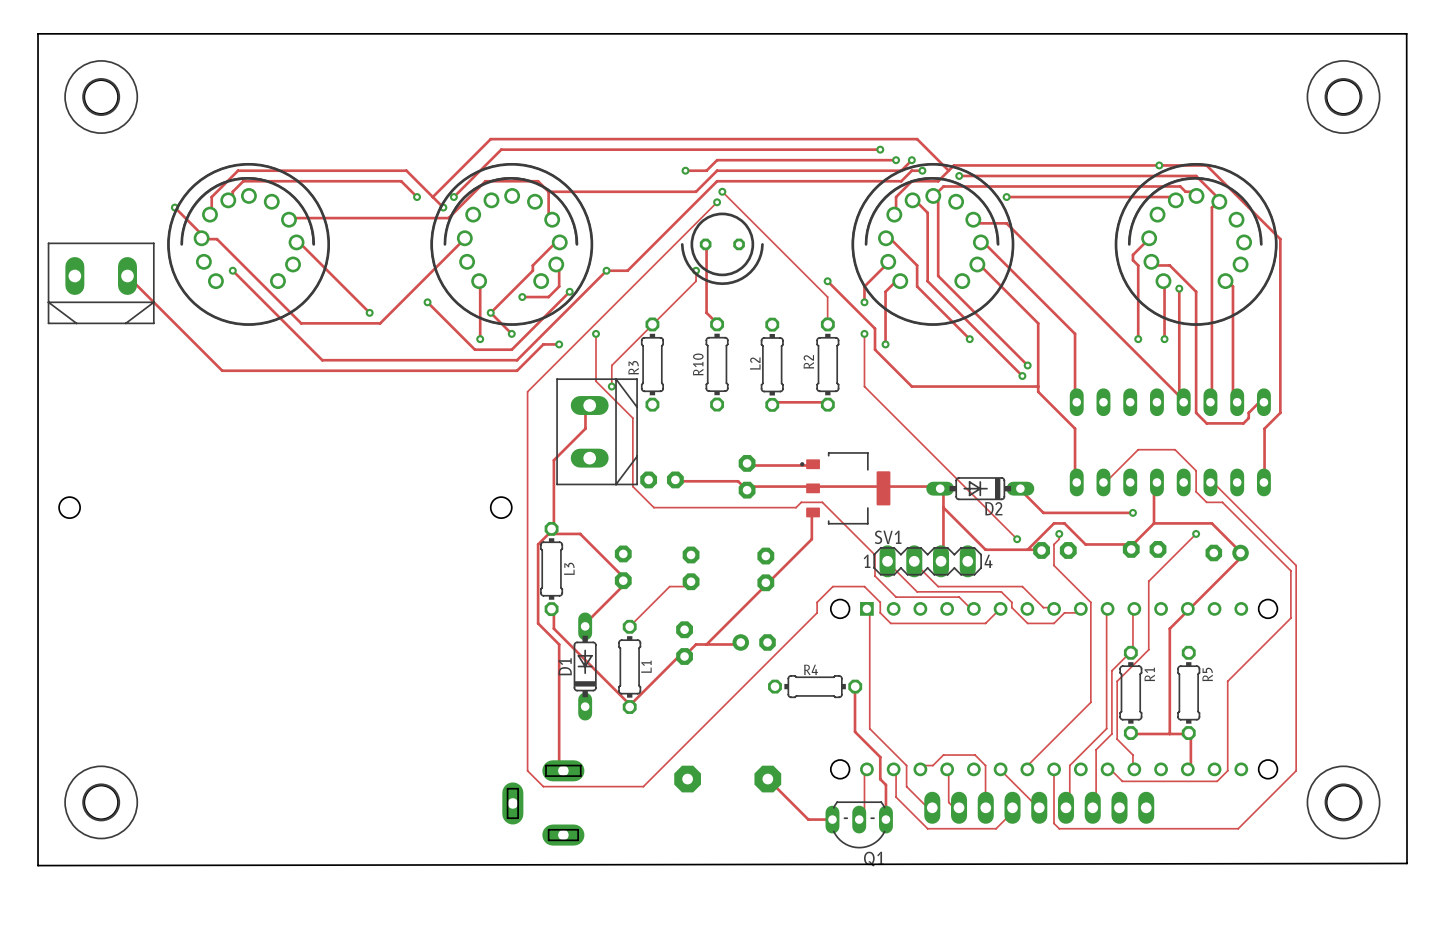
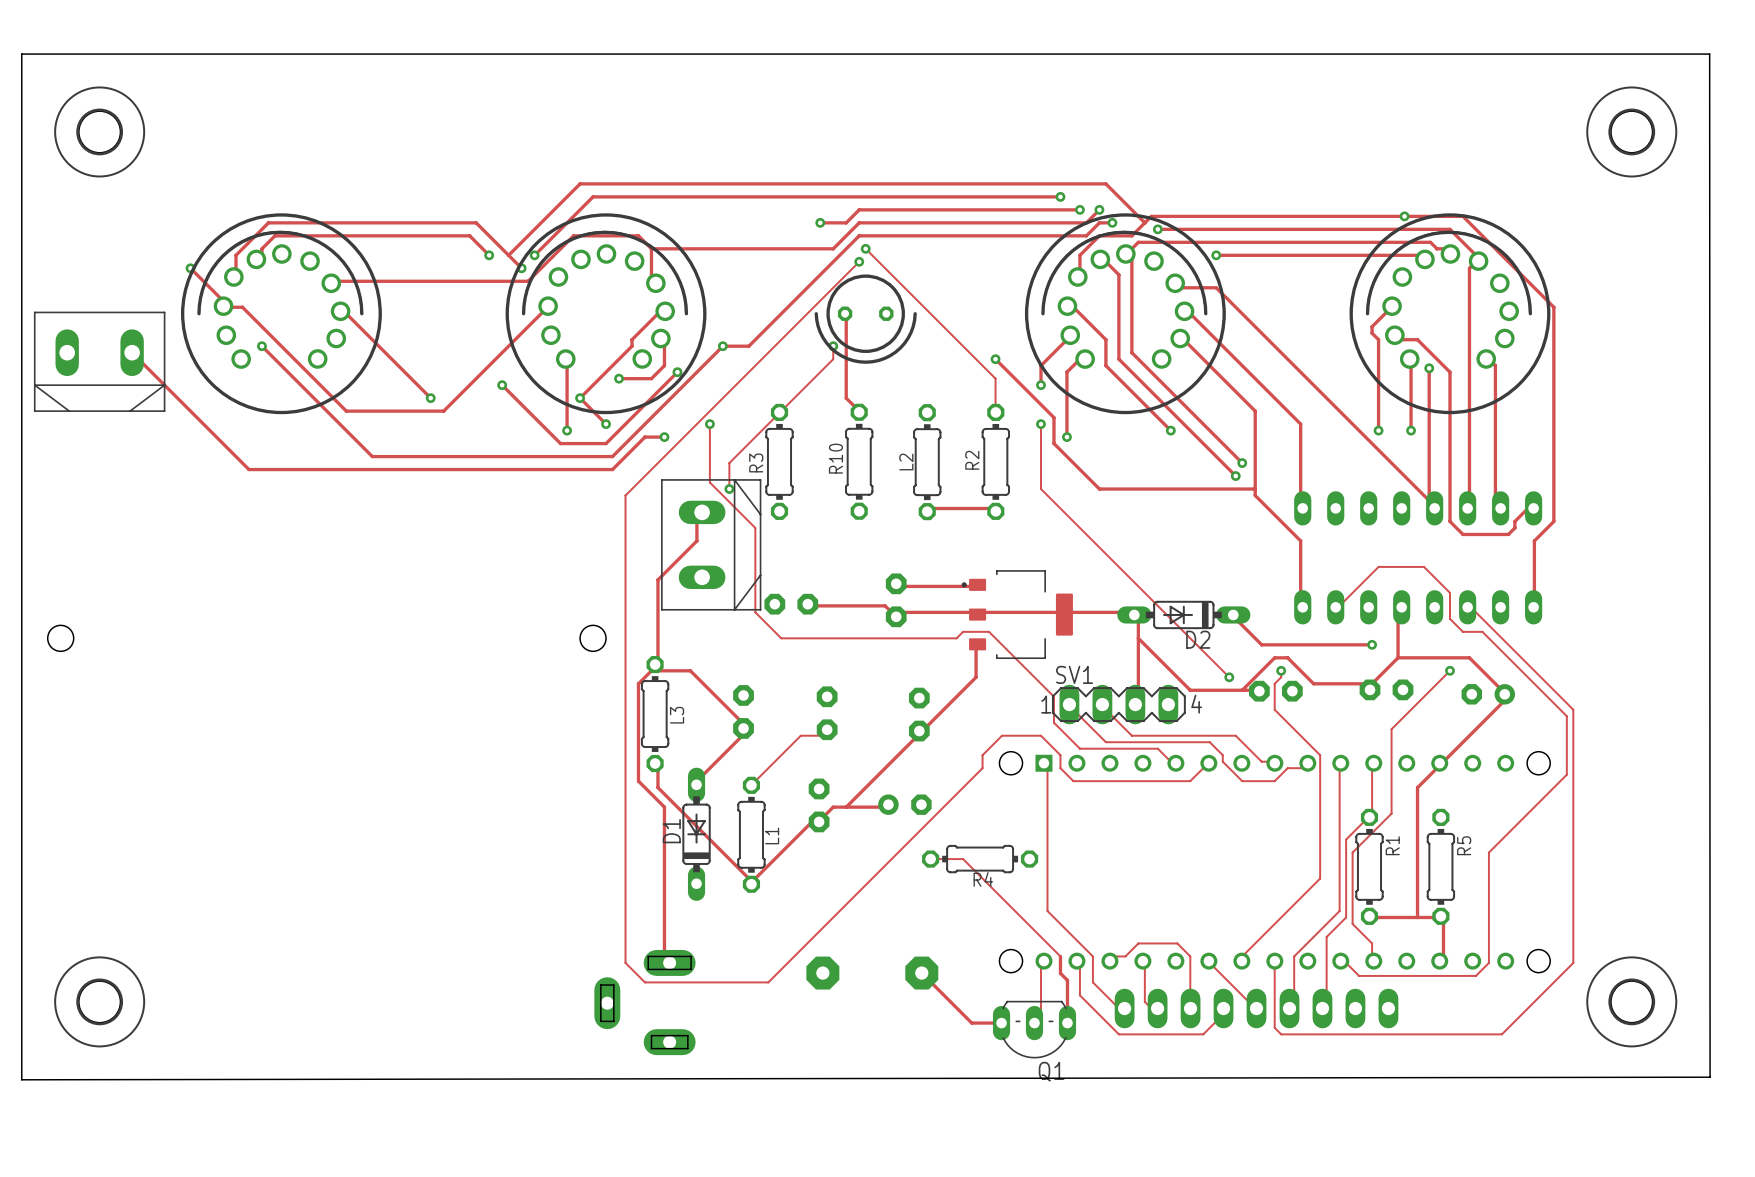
R4 name position: R4 (810, 669) -> R4 (983, 879)
track: (855, 686) (855, 731) (880, 757) (880, 765) -> (930, 859) (963, 859) (1060, 956)

